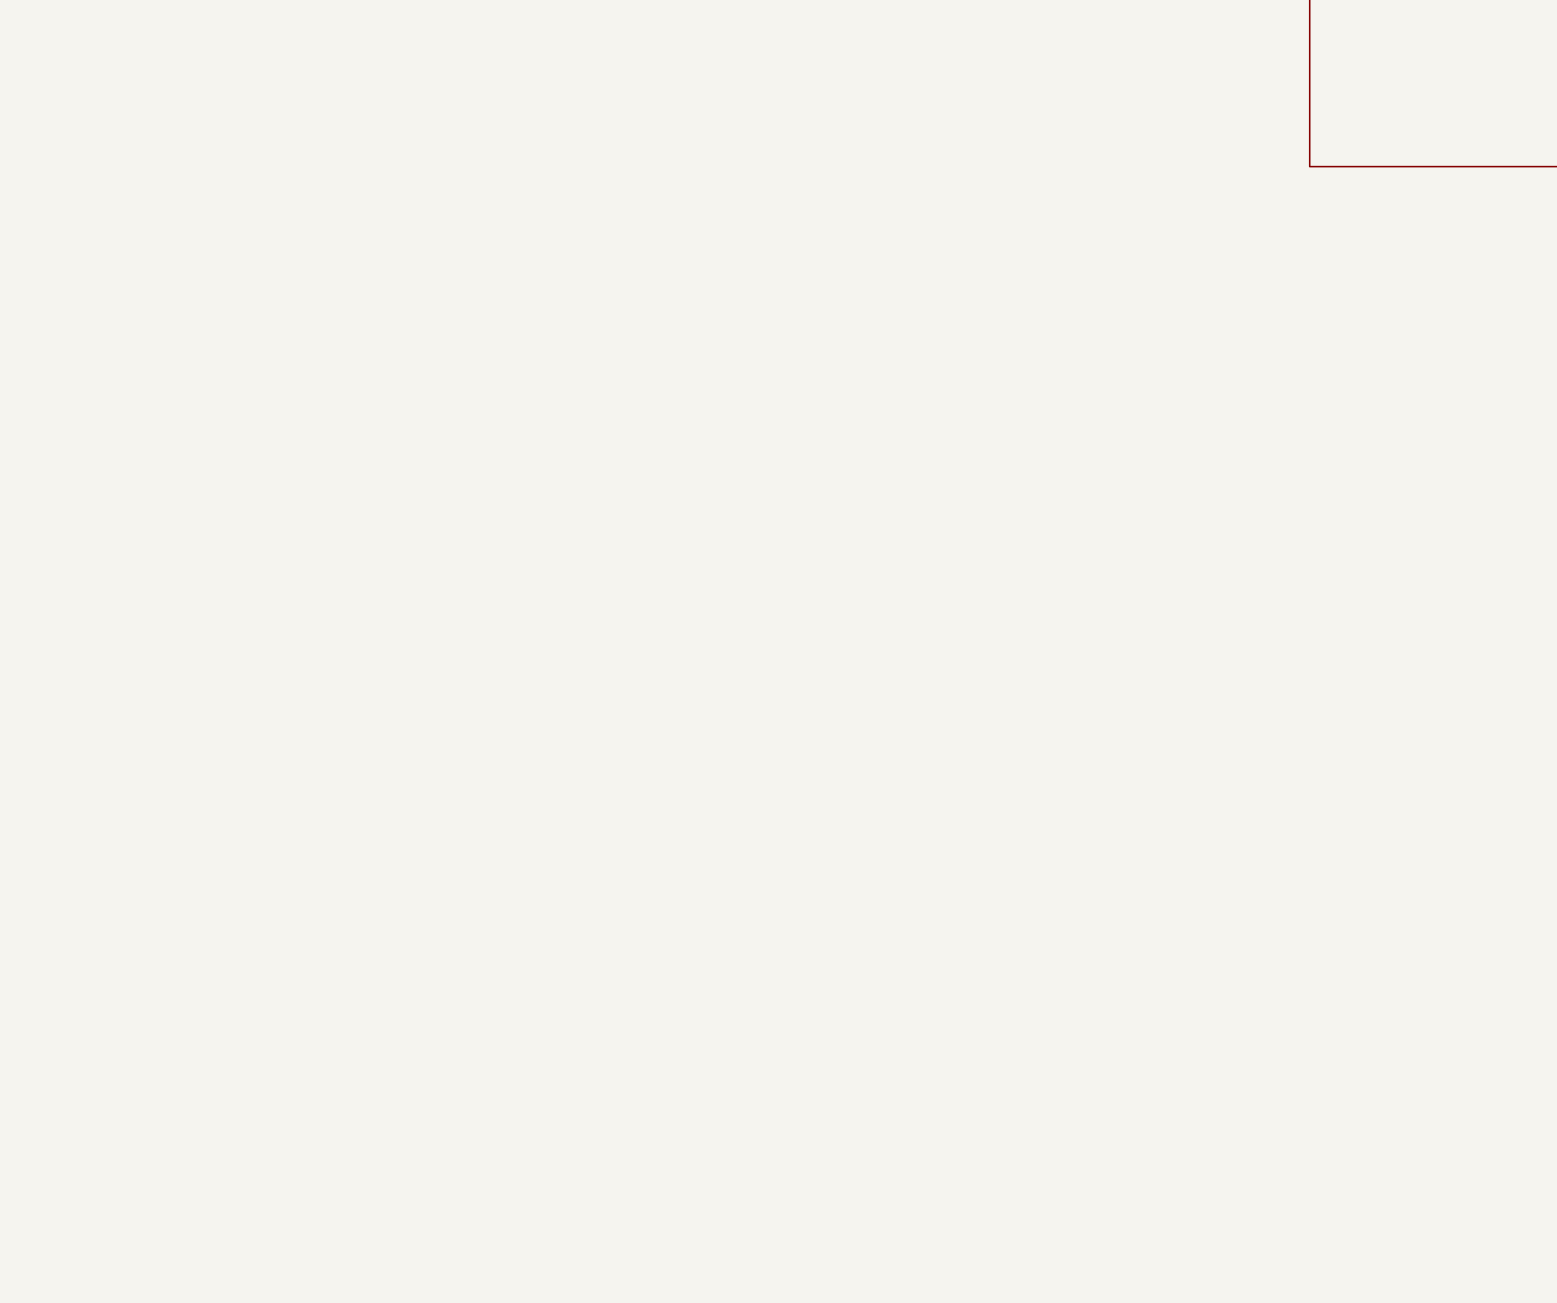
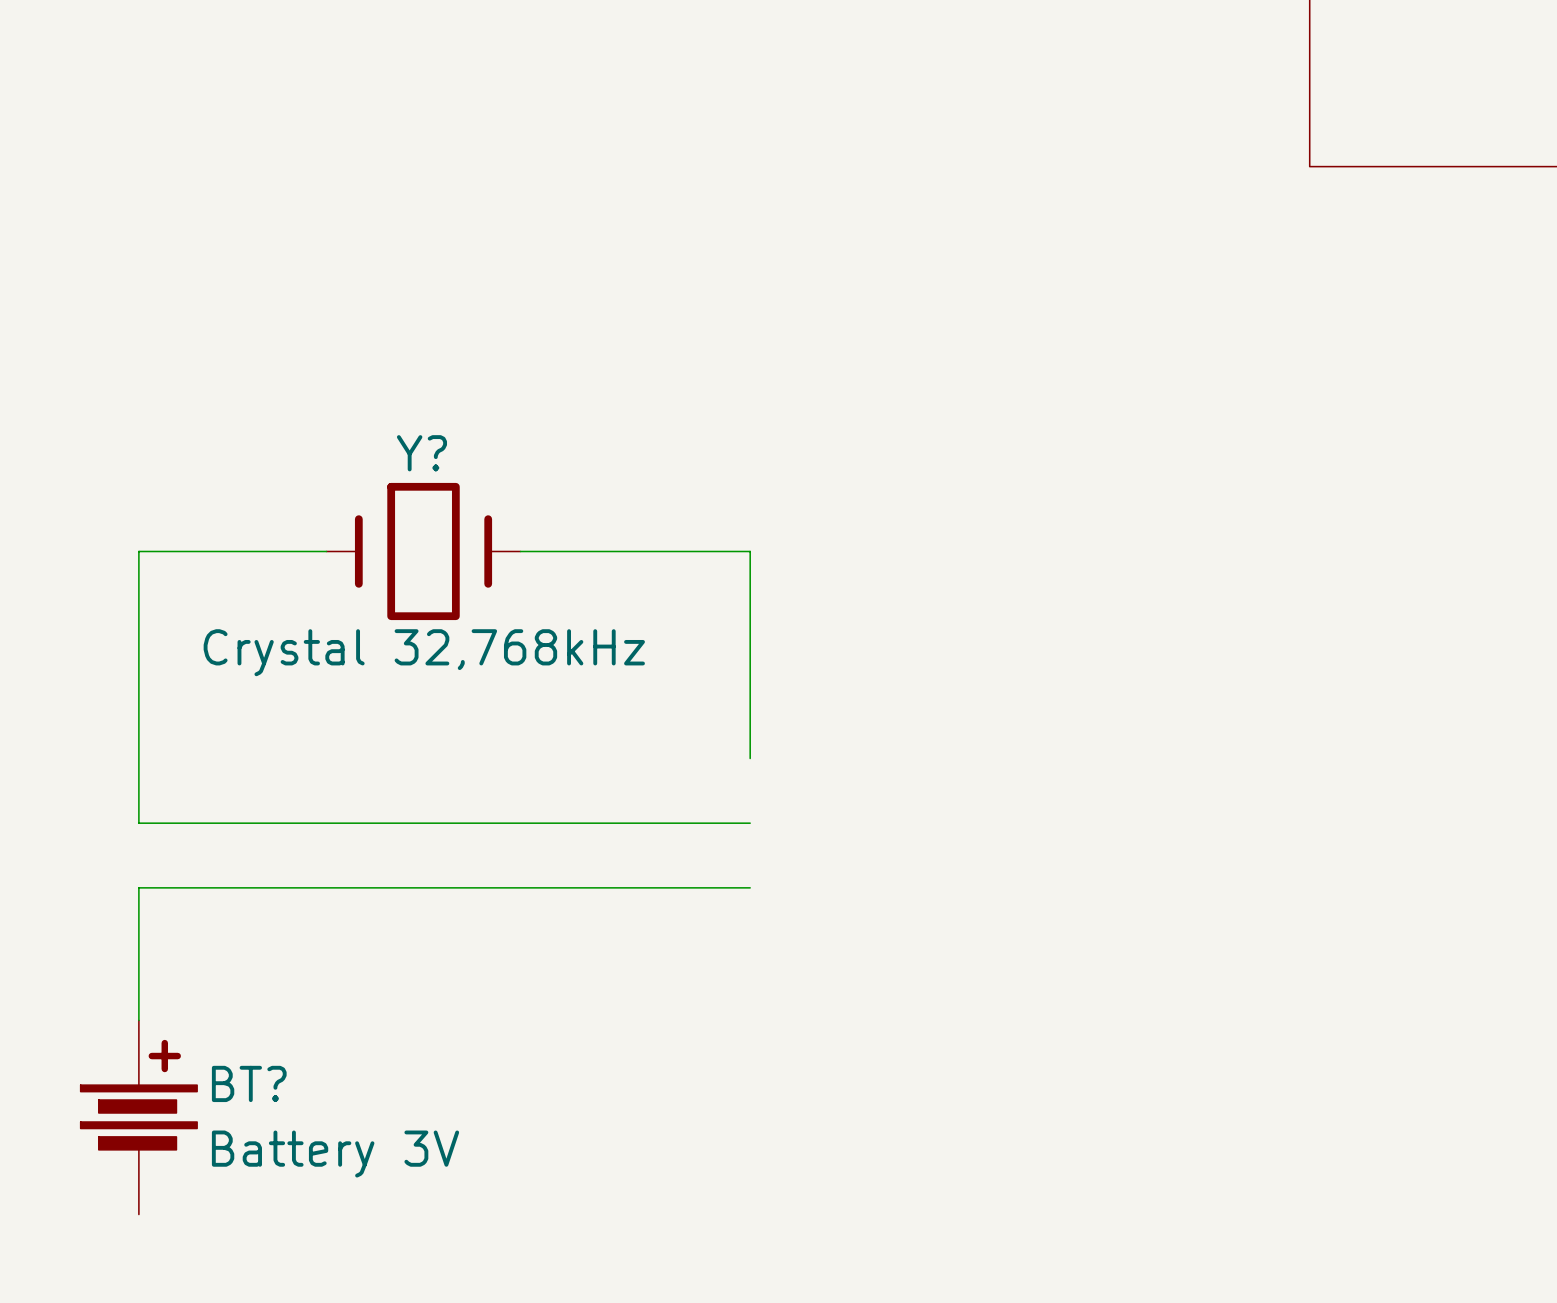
wire: none -> (326, 551) (138, 551) (138, 823) (750, 823)
Y?: none -> Crystal 32,768kHz (423, 551)
wire: none -> (520, 551) (750, 551) (750, 758)
wire: none -> (750, 887) (138, 887) (138, 1020)
BT?: none -> Battery 3V (138, 1117)

